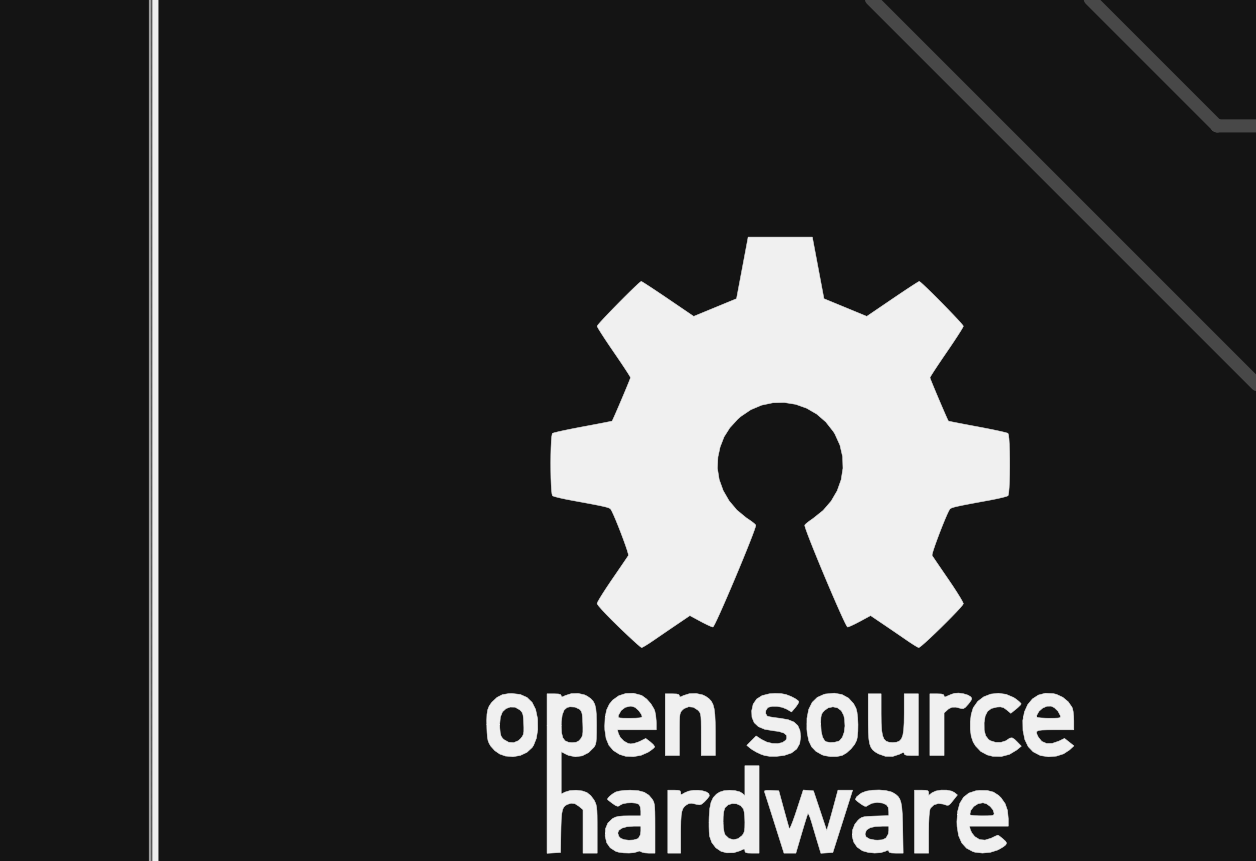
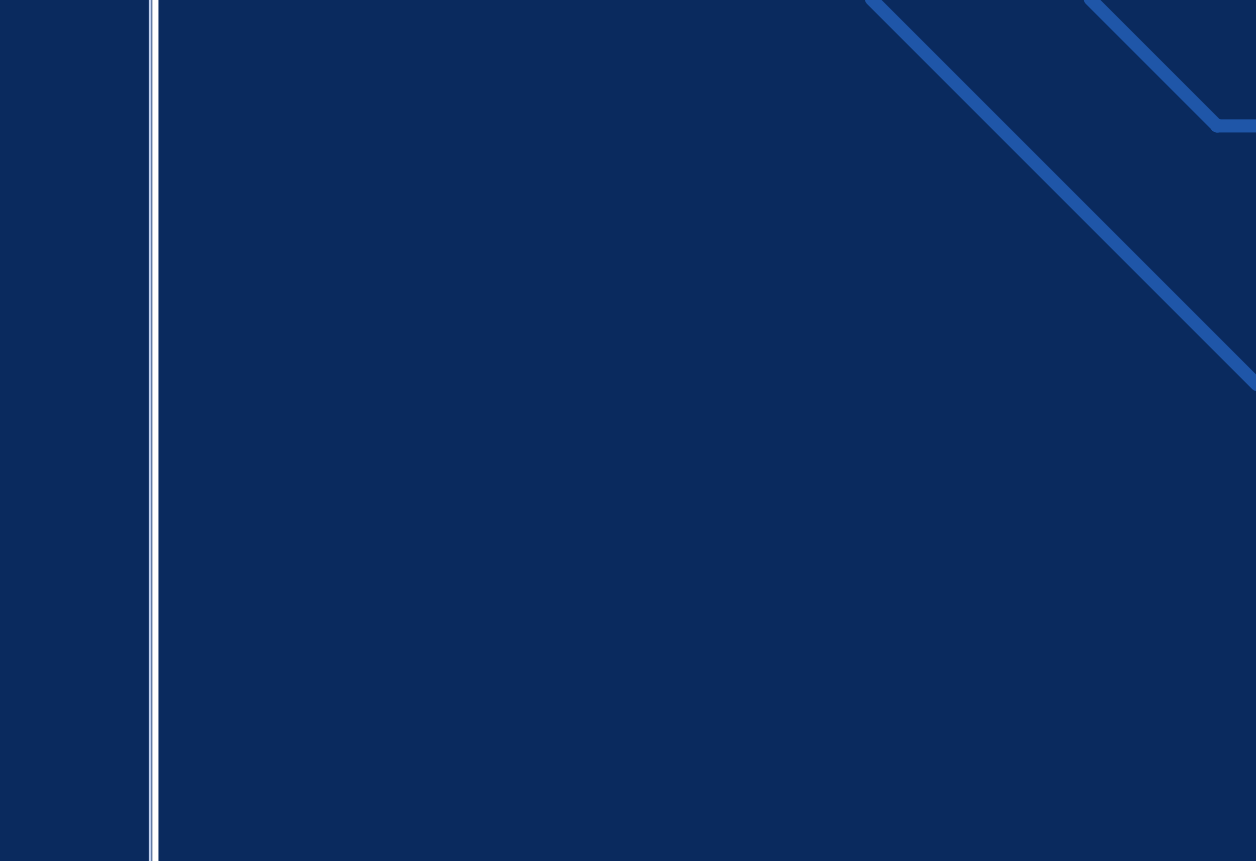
drawing: [486, 236, 1075, 854] -> none

